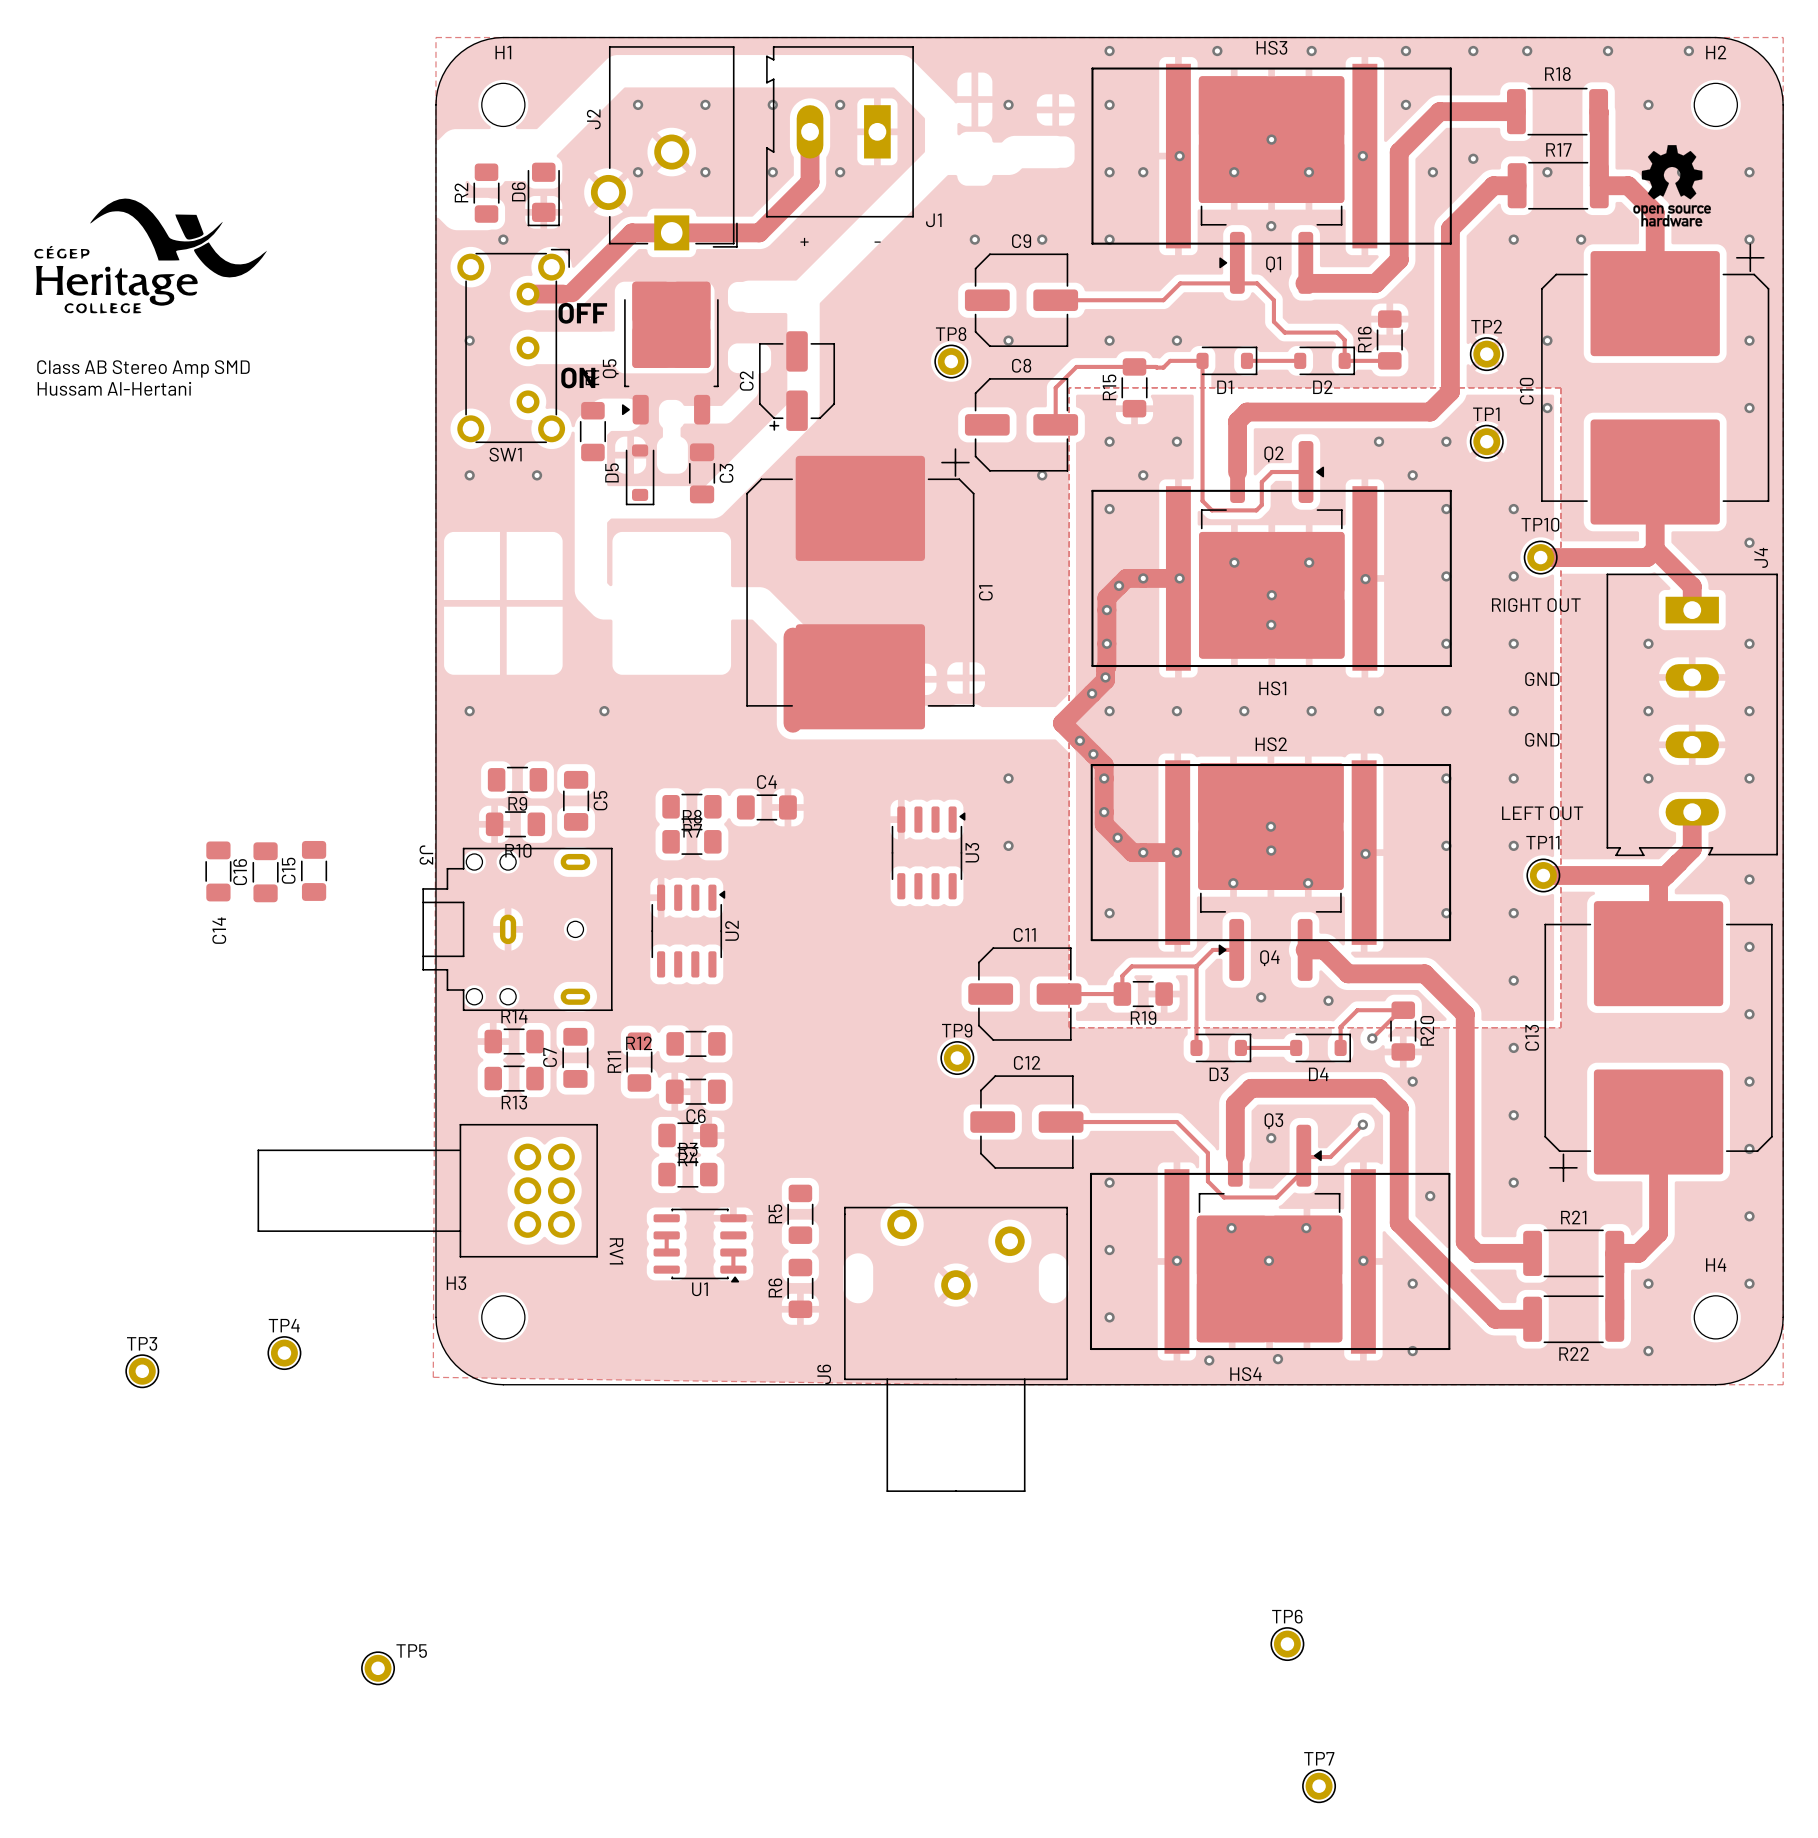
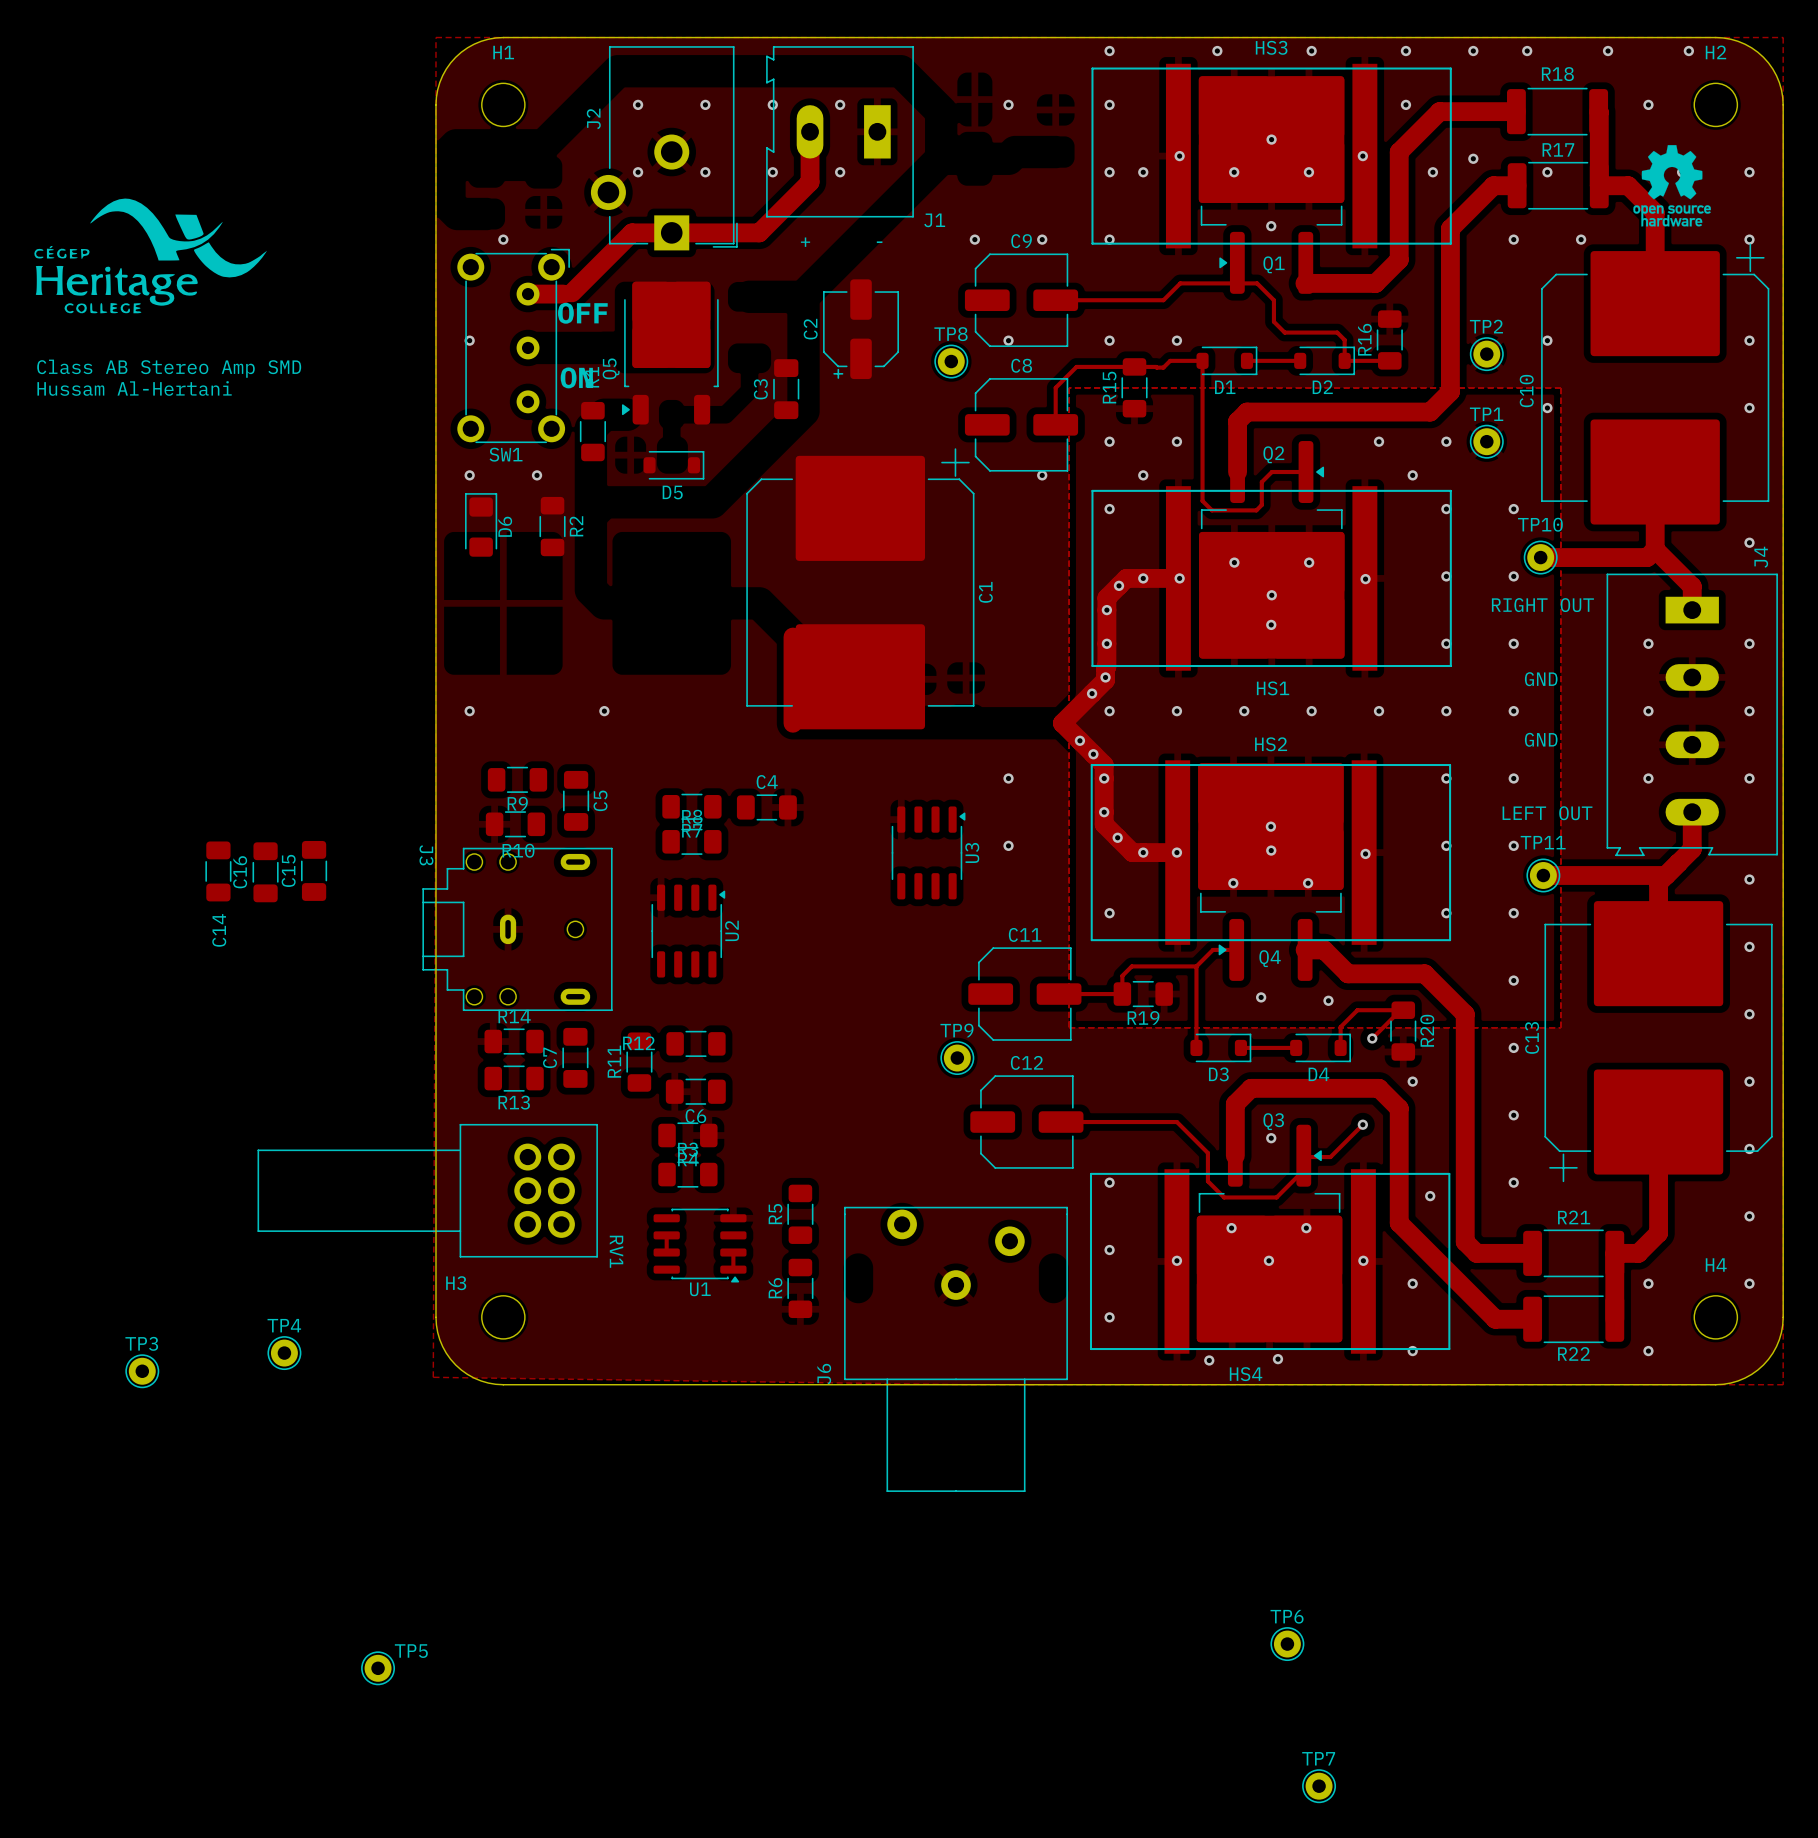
R2 name position: R2 (461, 192) -> R2 (576, 526)
R2 position: (486, 193) -> (552, 526)
D6 rotation: 0° (543, 194) -> 180° (481, 524)
D6 position: (543, 194) -> (481, 524)
C2 position: (797, 381) -> (861, 329)
C3 position: (702, 473) -> (786, 389)
C3 name position: C3 (726, 473) -> C3 (760, 389)
D5 rotation: 0° (640, 474) -> 90° counterclockwise (673, 465)

